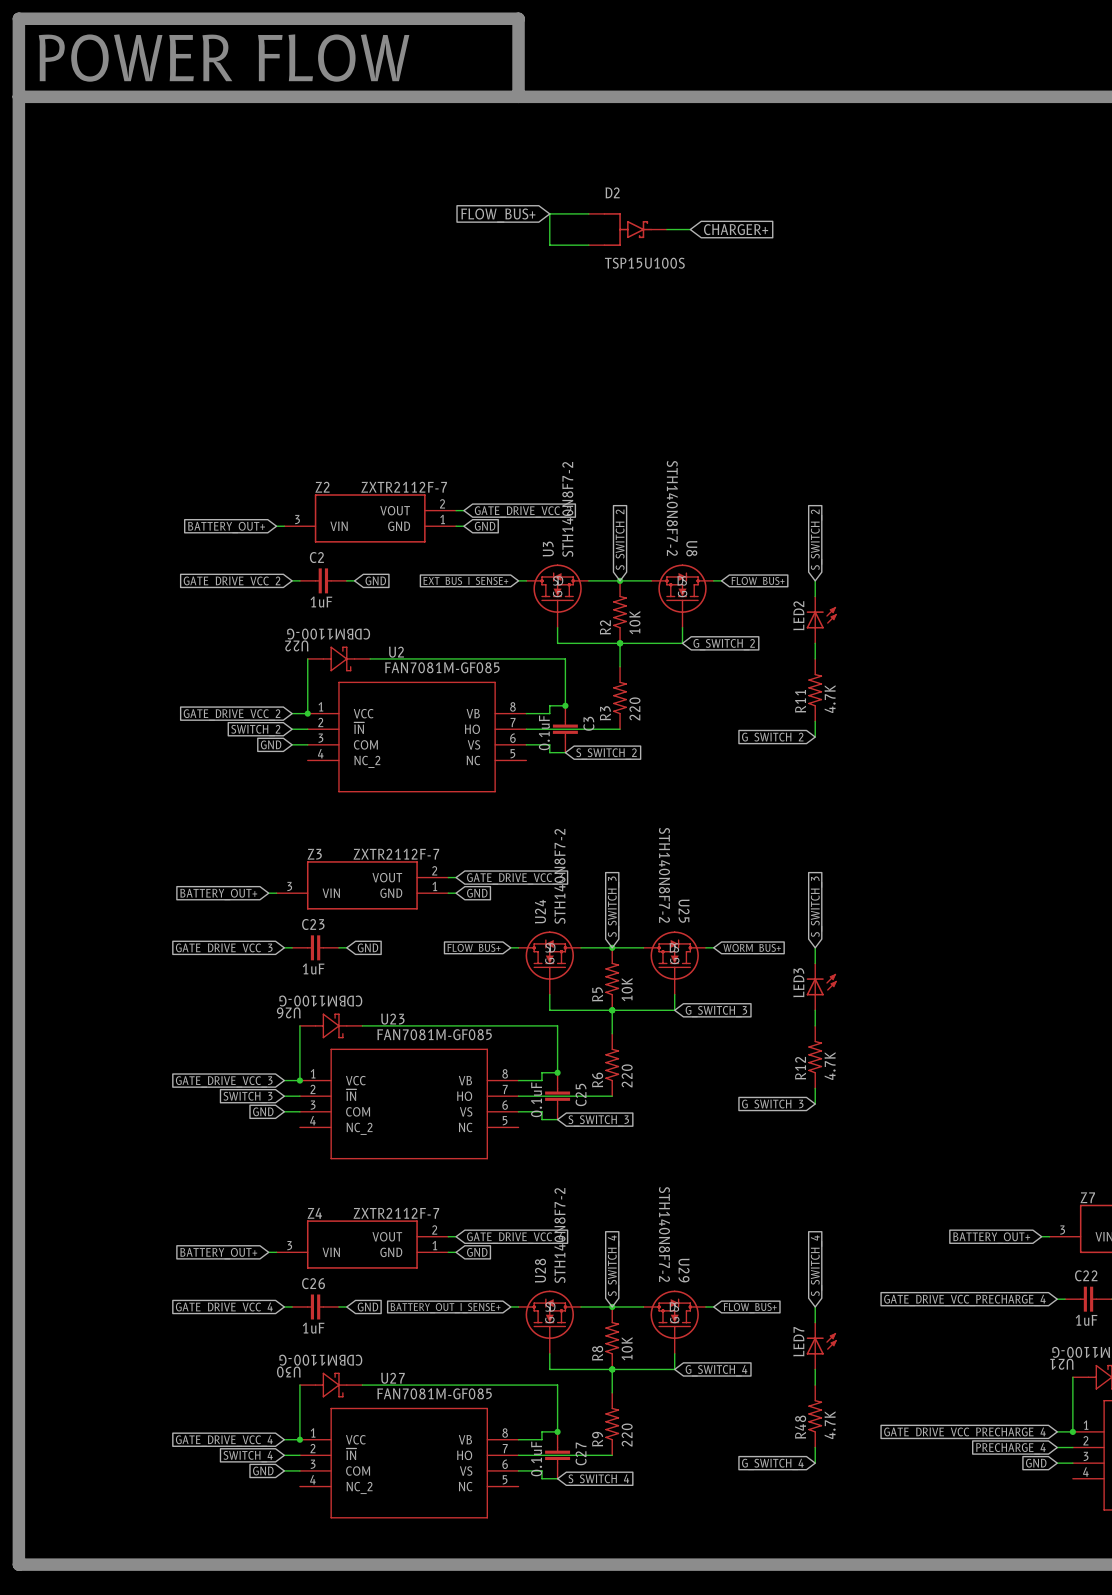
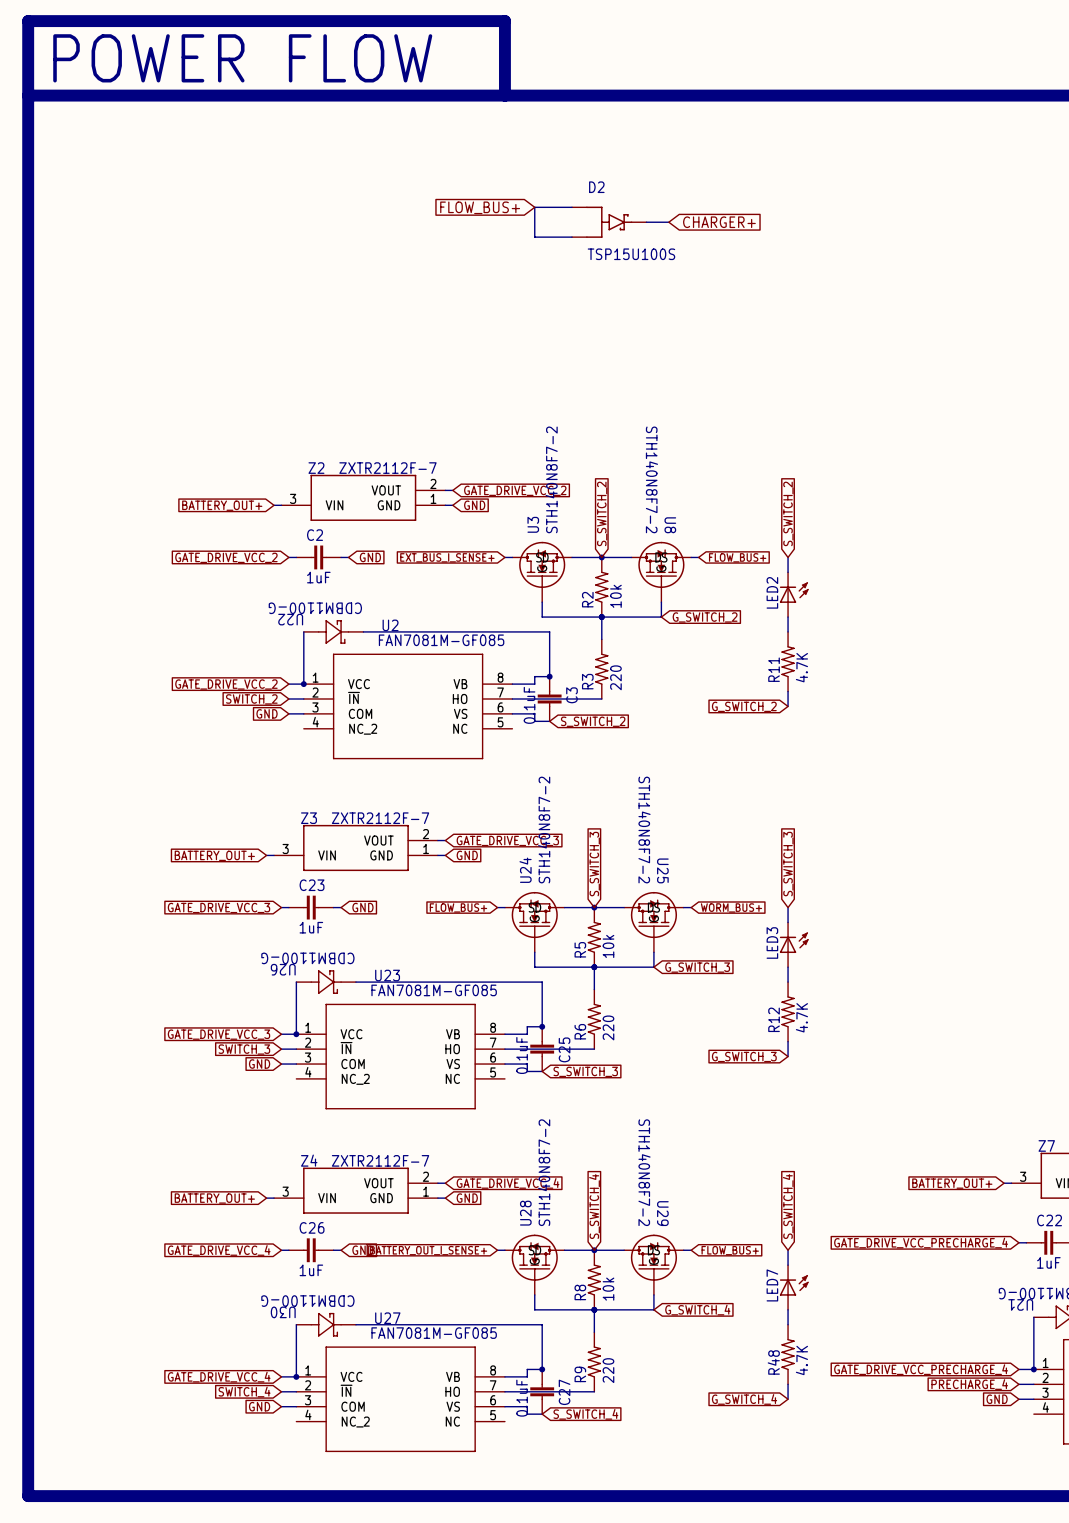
R2 value: 10K (634, 622) -> 10k (615, 596)
R5 value: 10K (627, 989) -> 10k (608, 946)
R8 value: 10K (627, 1348) -> 10k (608, 1289)

